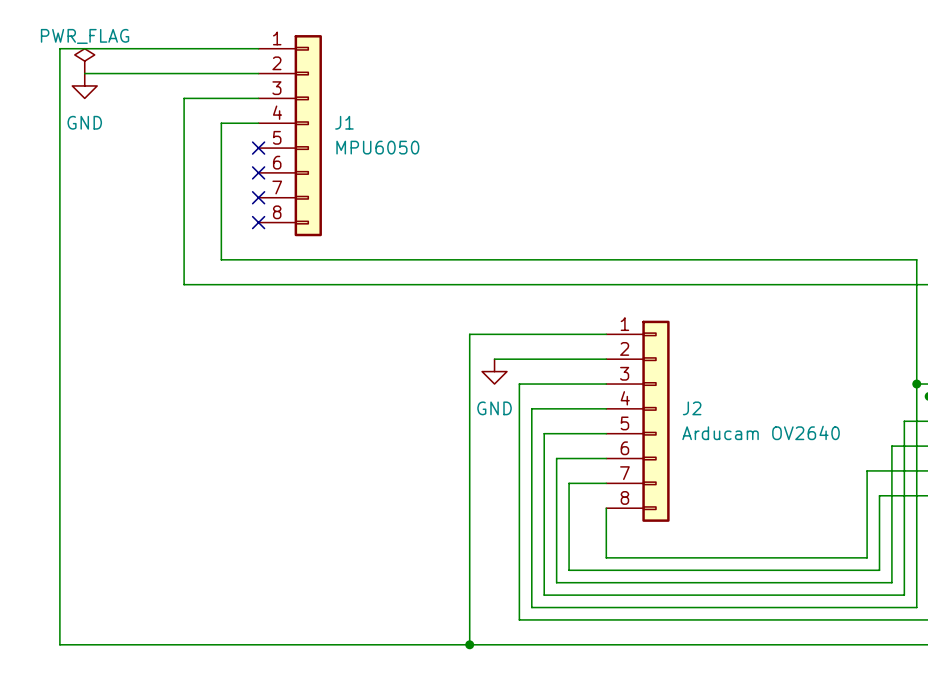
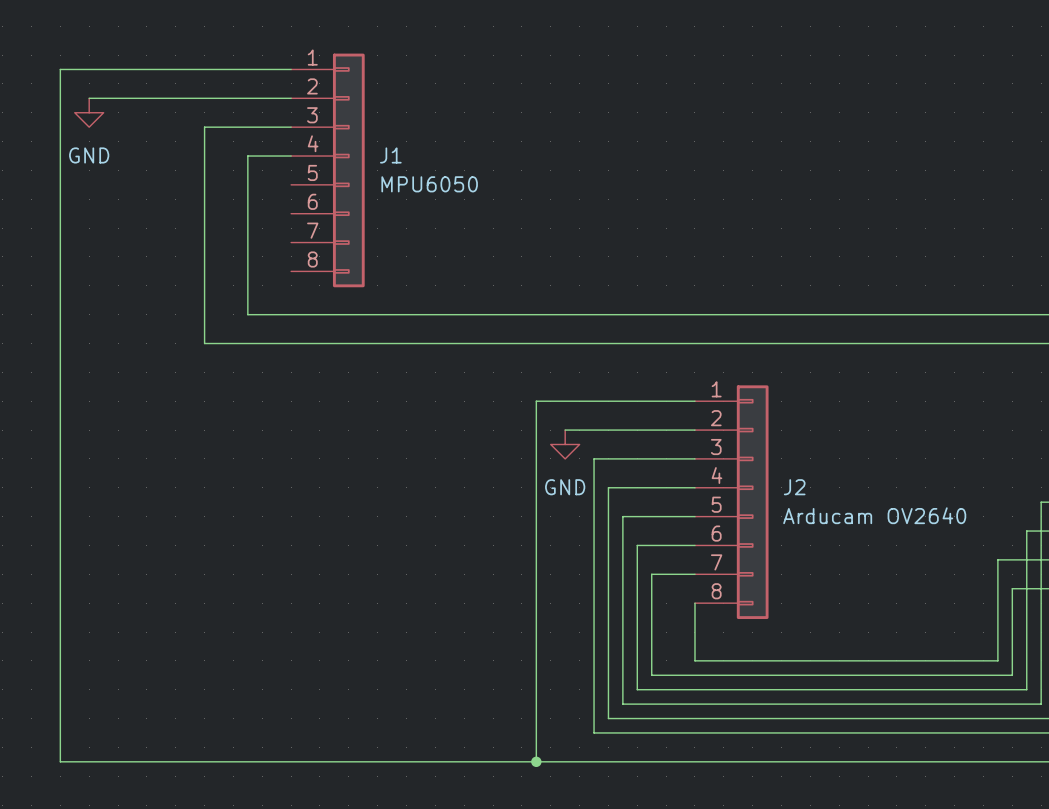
power symbol: PWR_FLAG (84, 61) -> none
no-connect mark: (258, 148) -> none
no-connect mark: (258, 172) -> none
no-connect mark: (258, 197) -> none
no-connect mark: (258, 222) -> none

